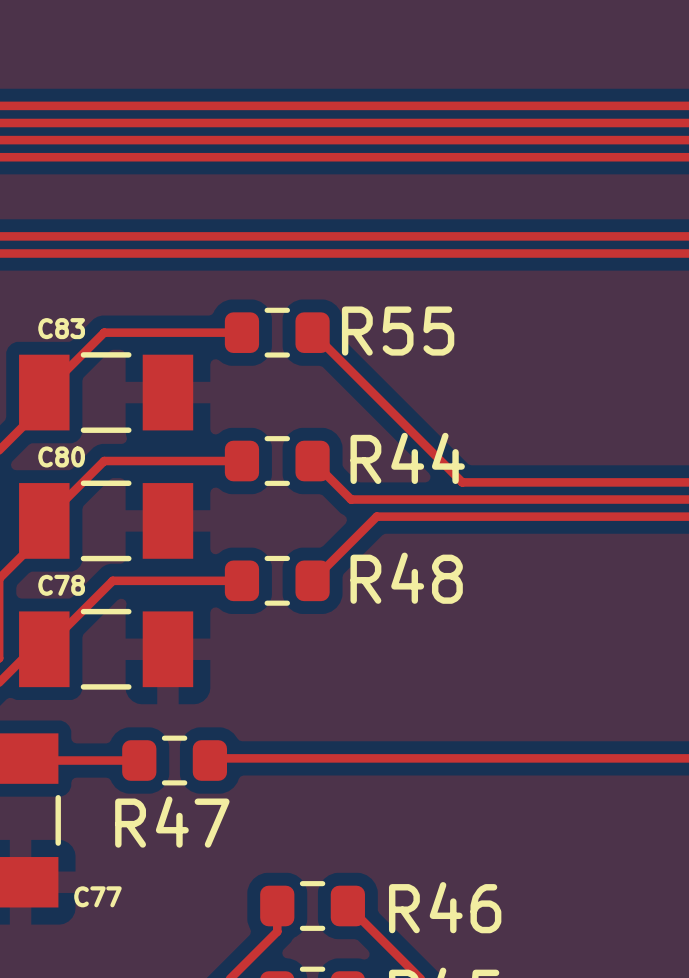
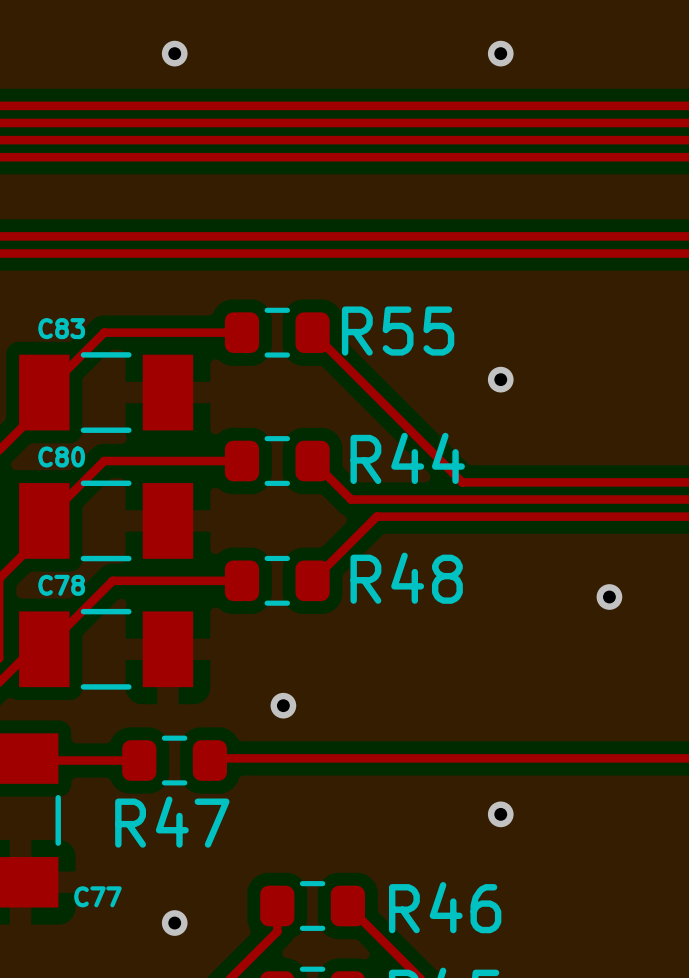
via: none -> (174, 53)
via: none -> (500, 53)
via: none -> (500, 379)
via: none -> (609, 597)
via: none -> (283, 705)
via: none -> (500, 814)
via: none -> (174, 923)

